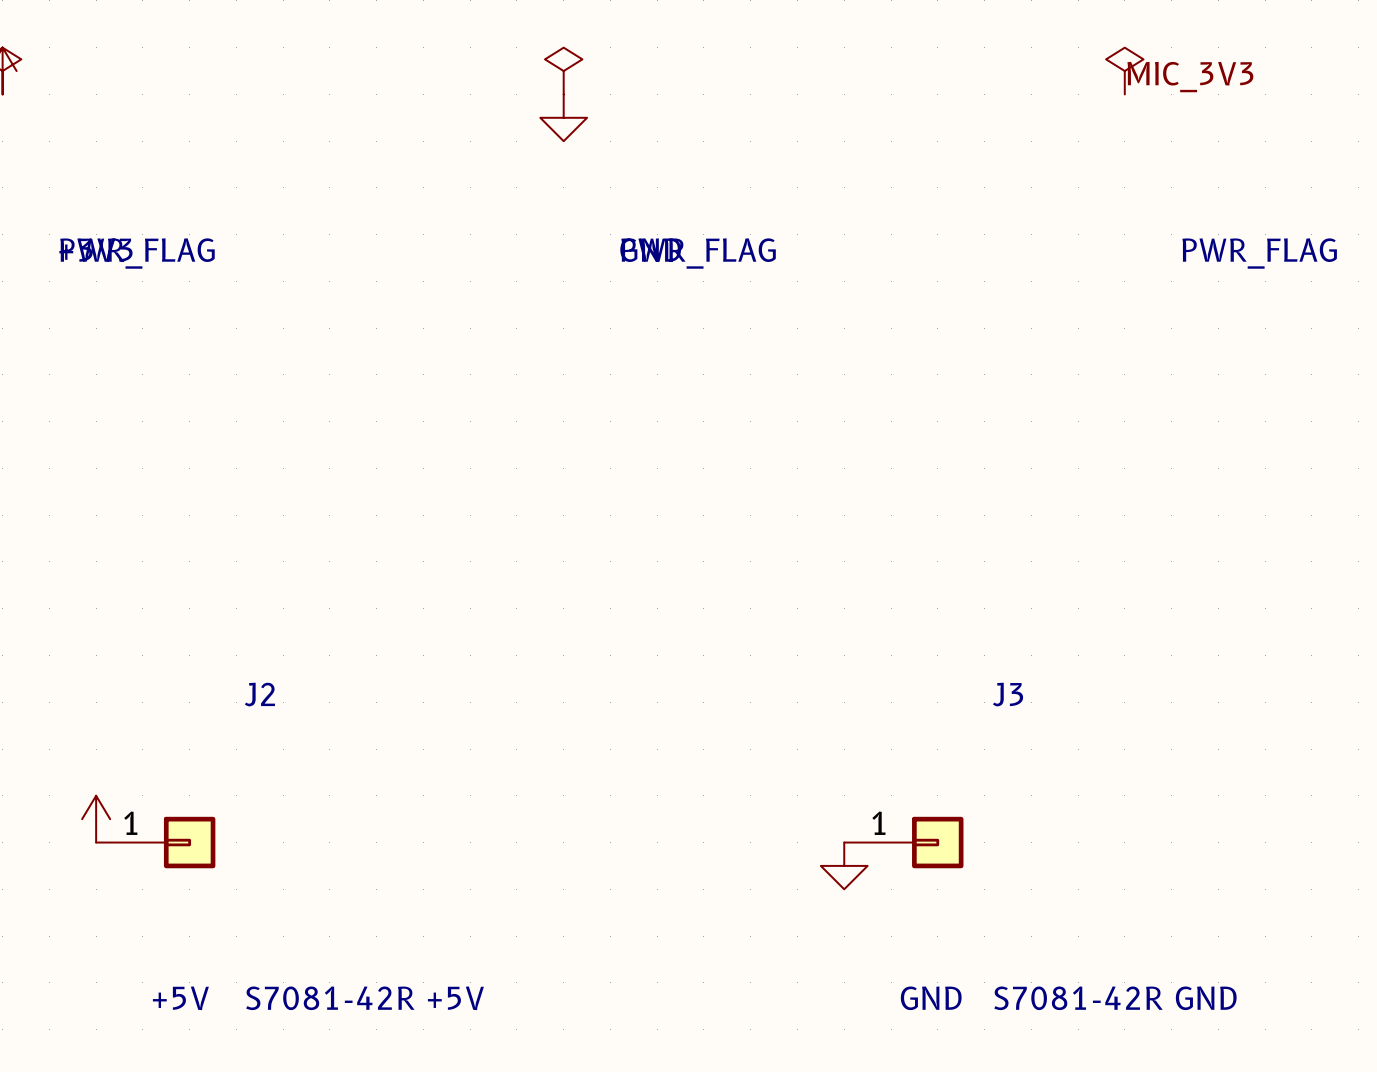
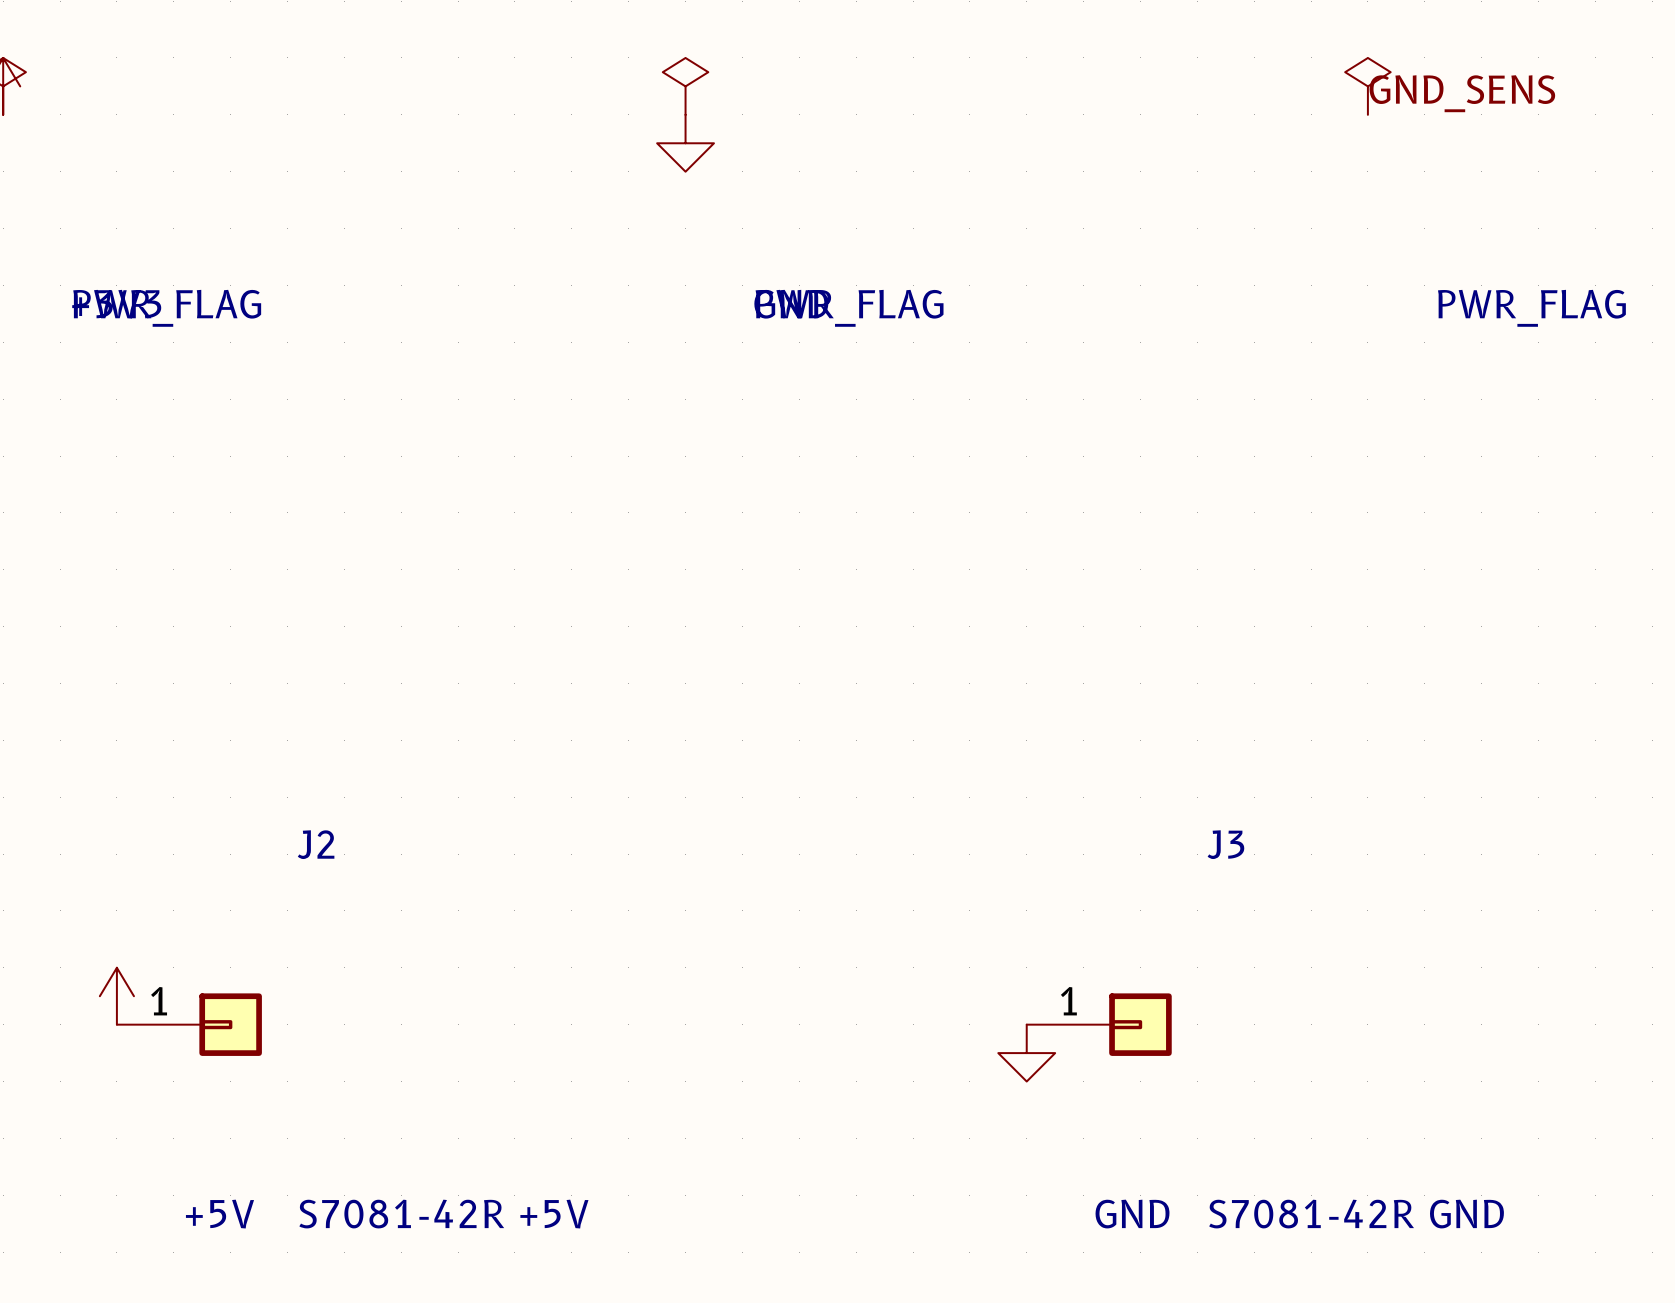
label: MIC_3V3 (1190, 77) -> GND_SENS (1462, 93)

